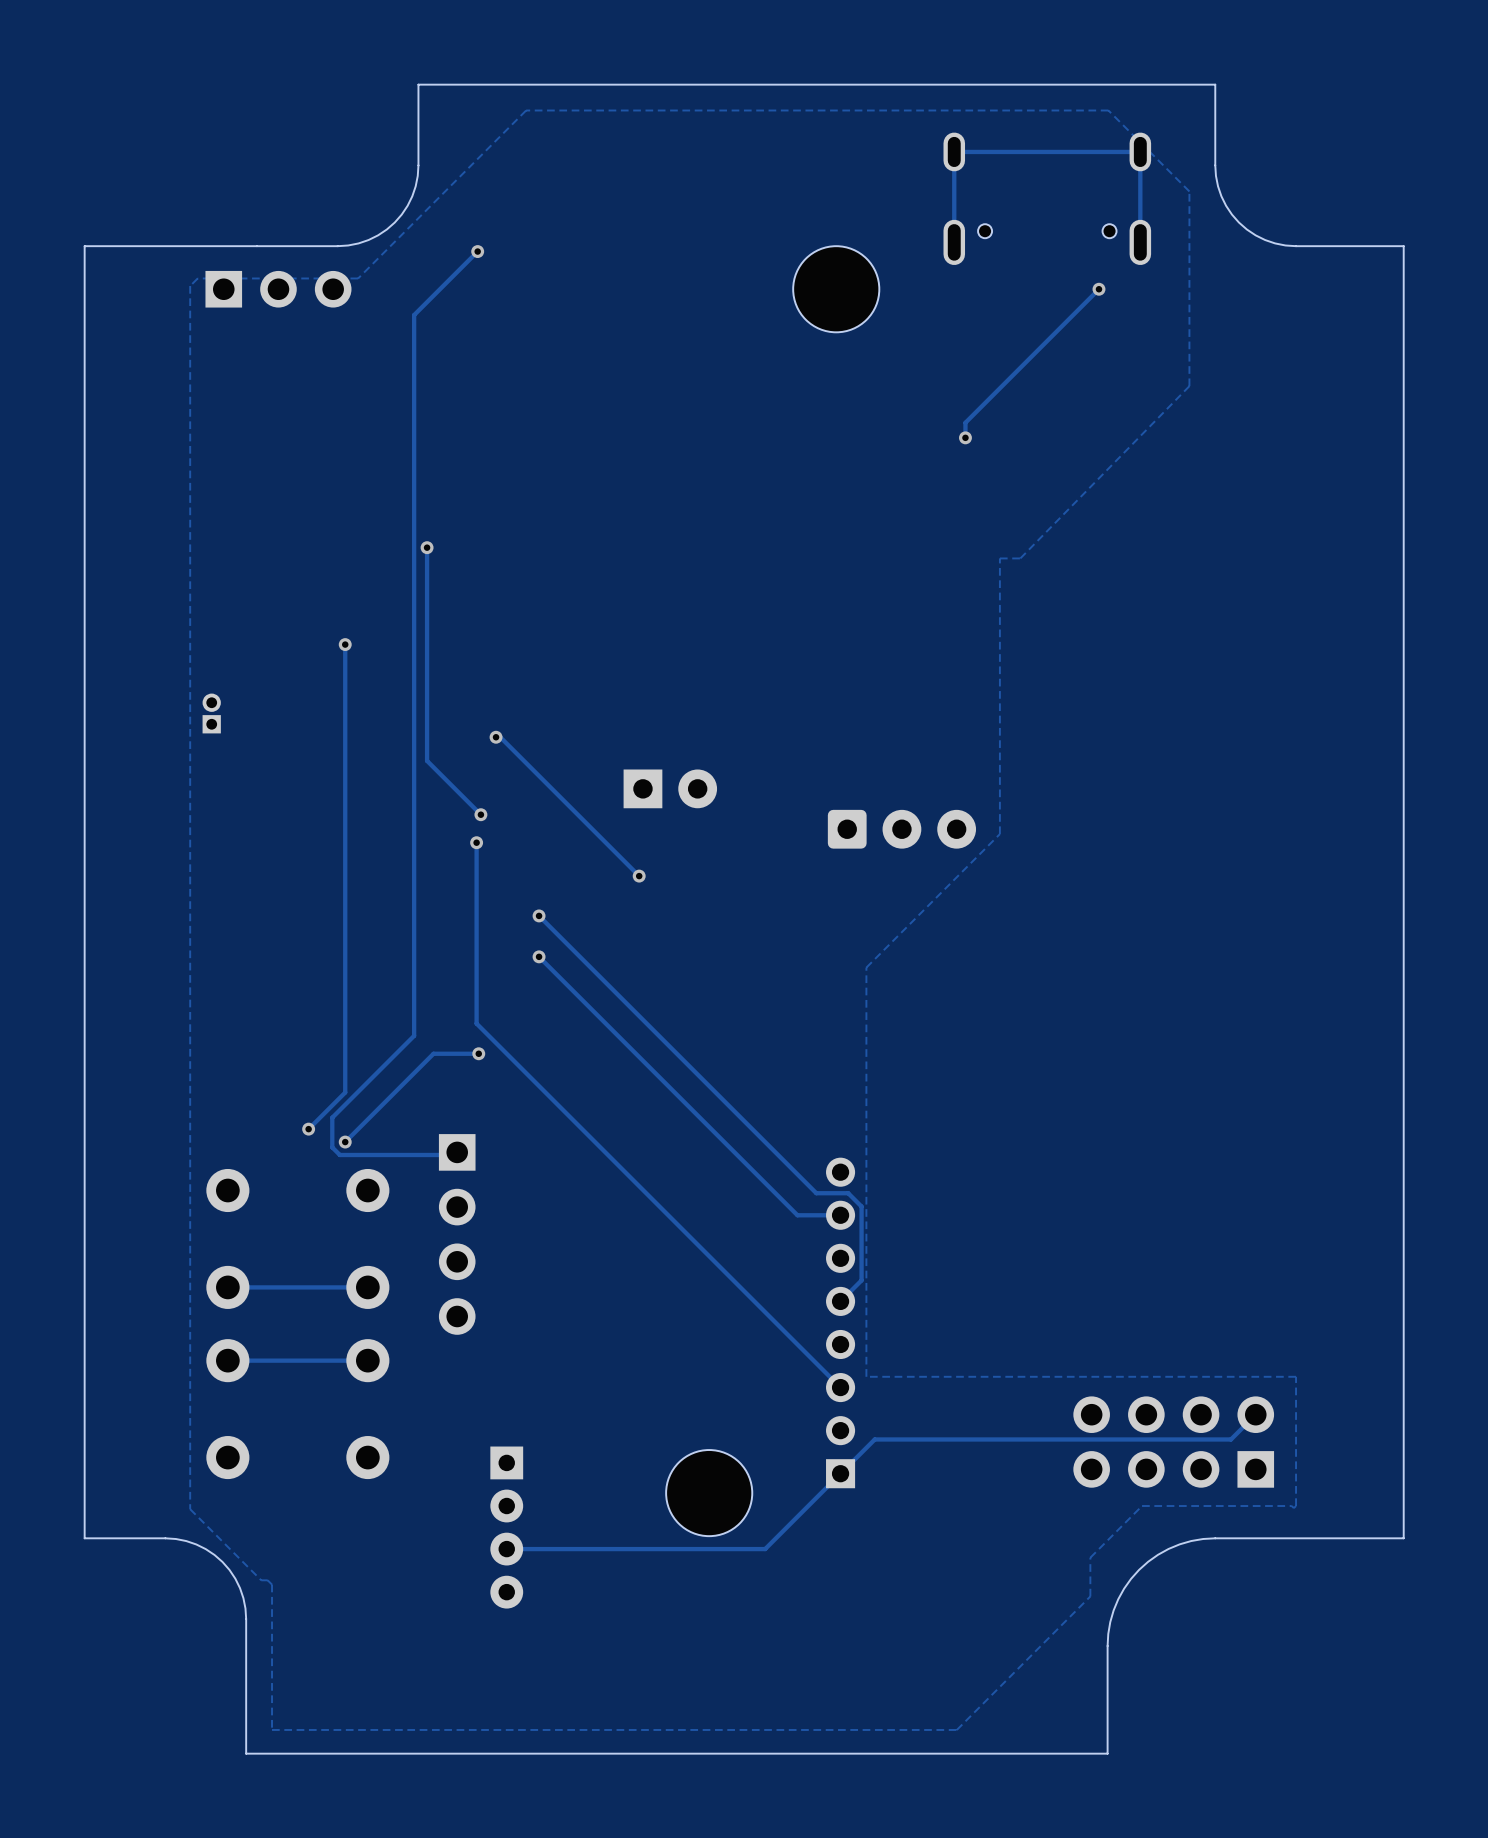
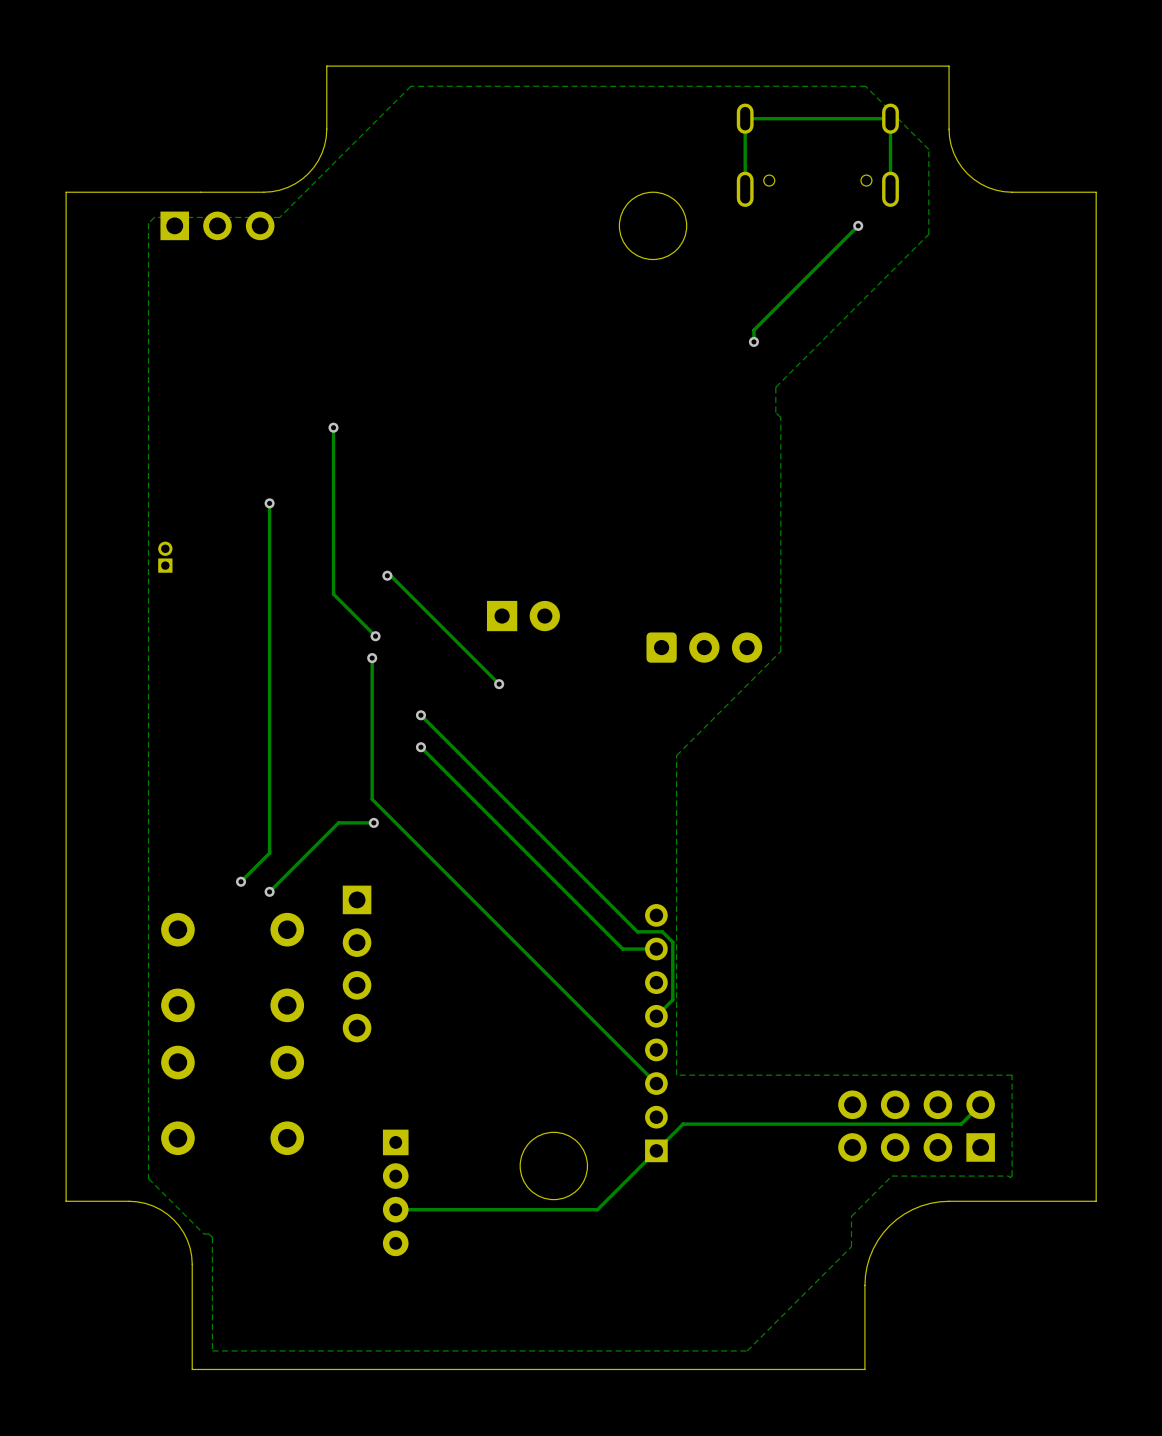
track: (477, 251) (414, 315) (414, 1035) (332, 1117) (332, 1147) (339, 1155) (454, 1155) (457, 1152) -> none
via: (477, 251) -> none
zone outline: (1189, 300) (1189, 386) (1020, 558) (999, 558) -> (928, 234) (775, 387) (775, 412) (780, 417) (780, 436)
track: (367, 1287) (227, 1287) -> none
track: (367, 1360) (227, 1360) -> none

